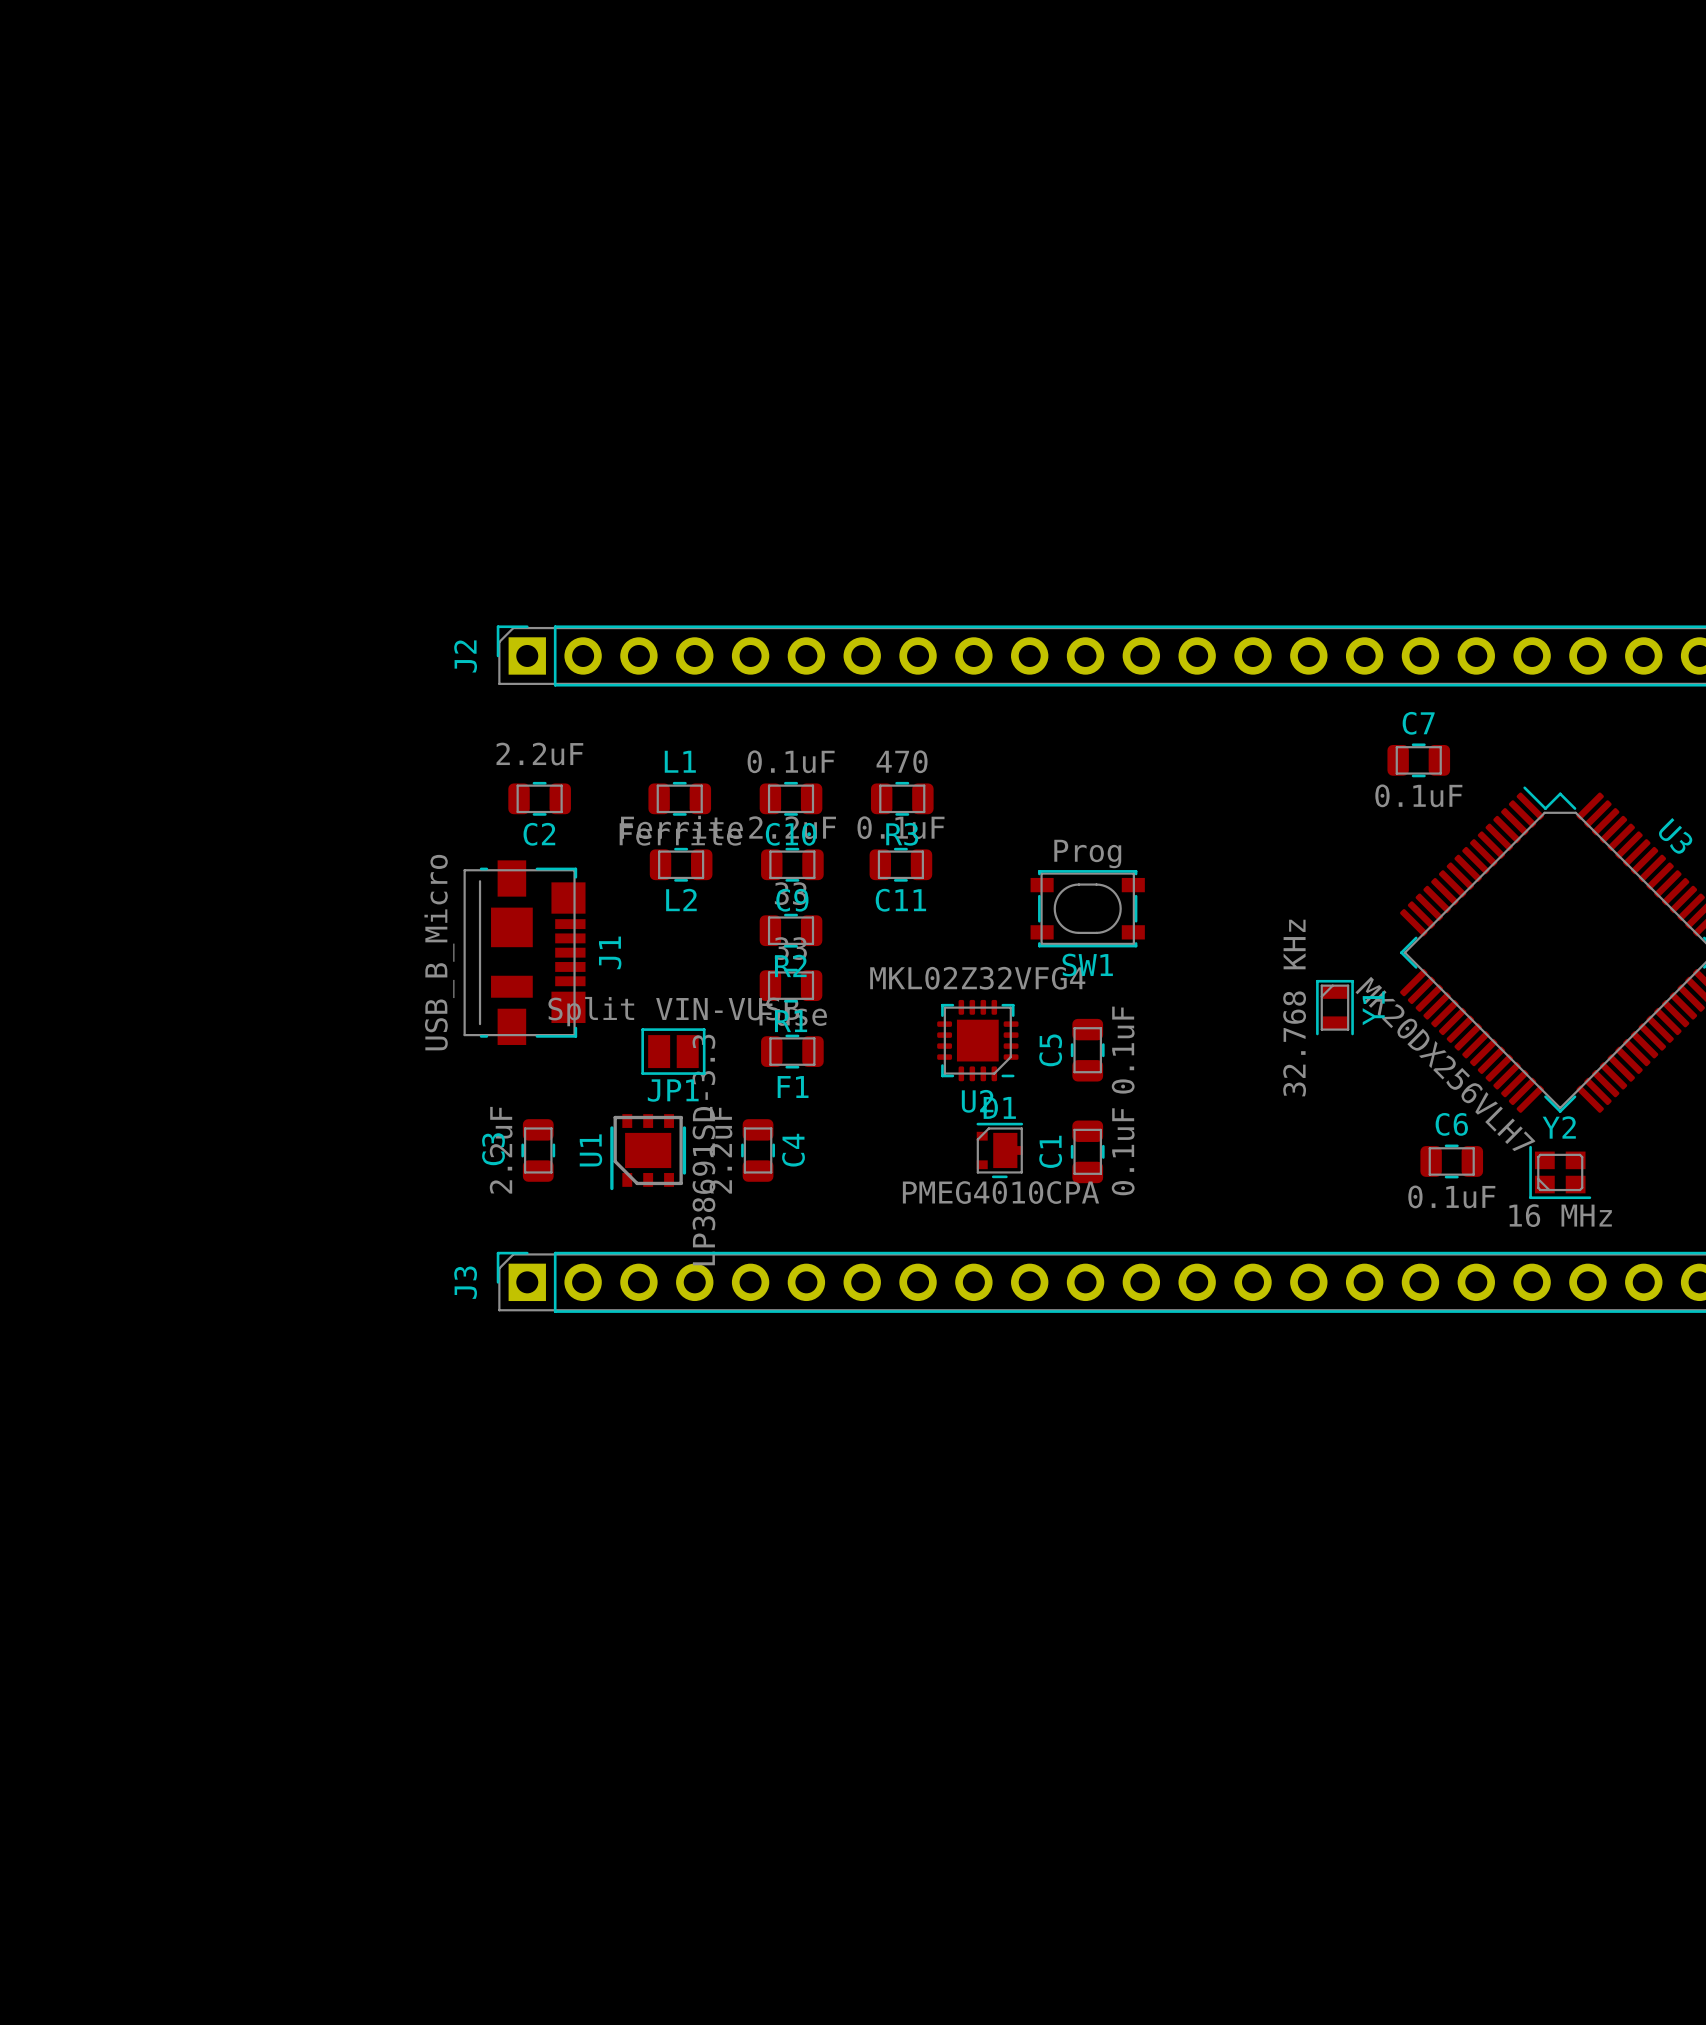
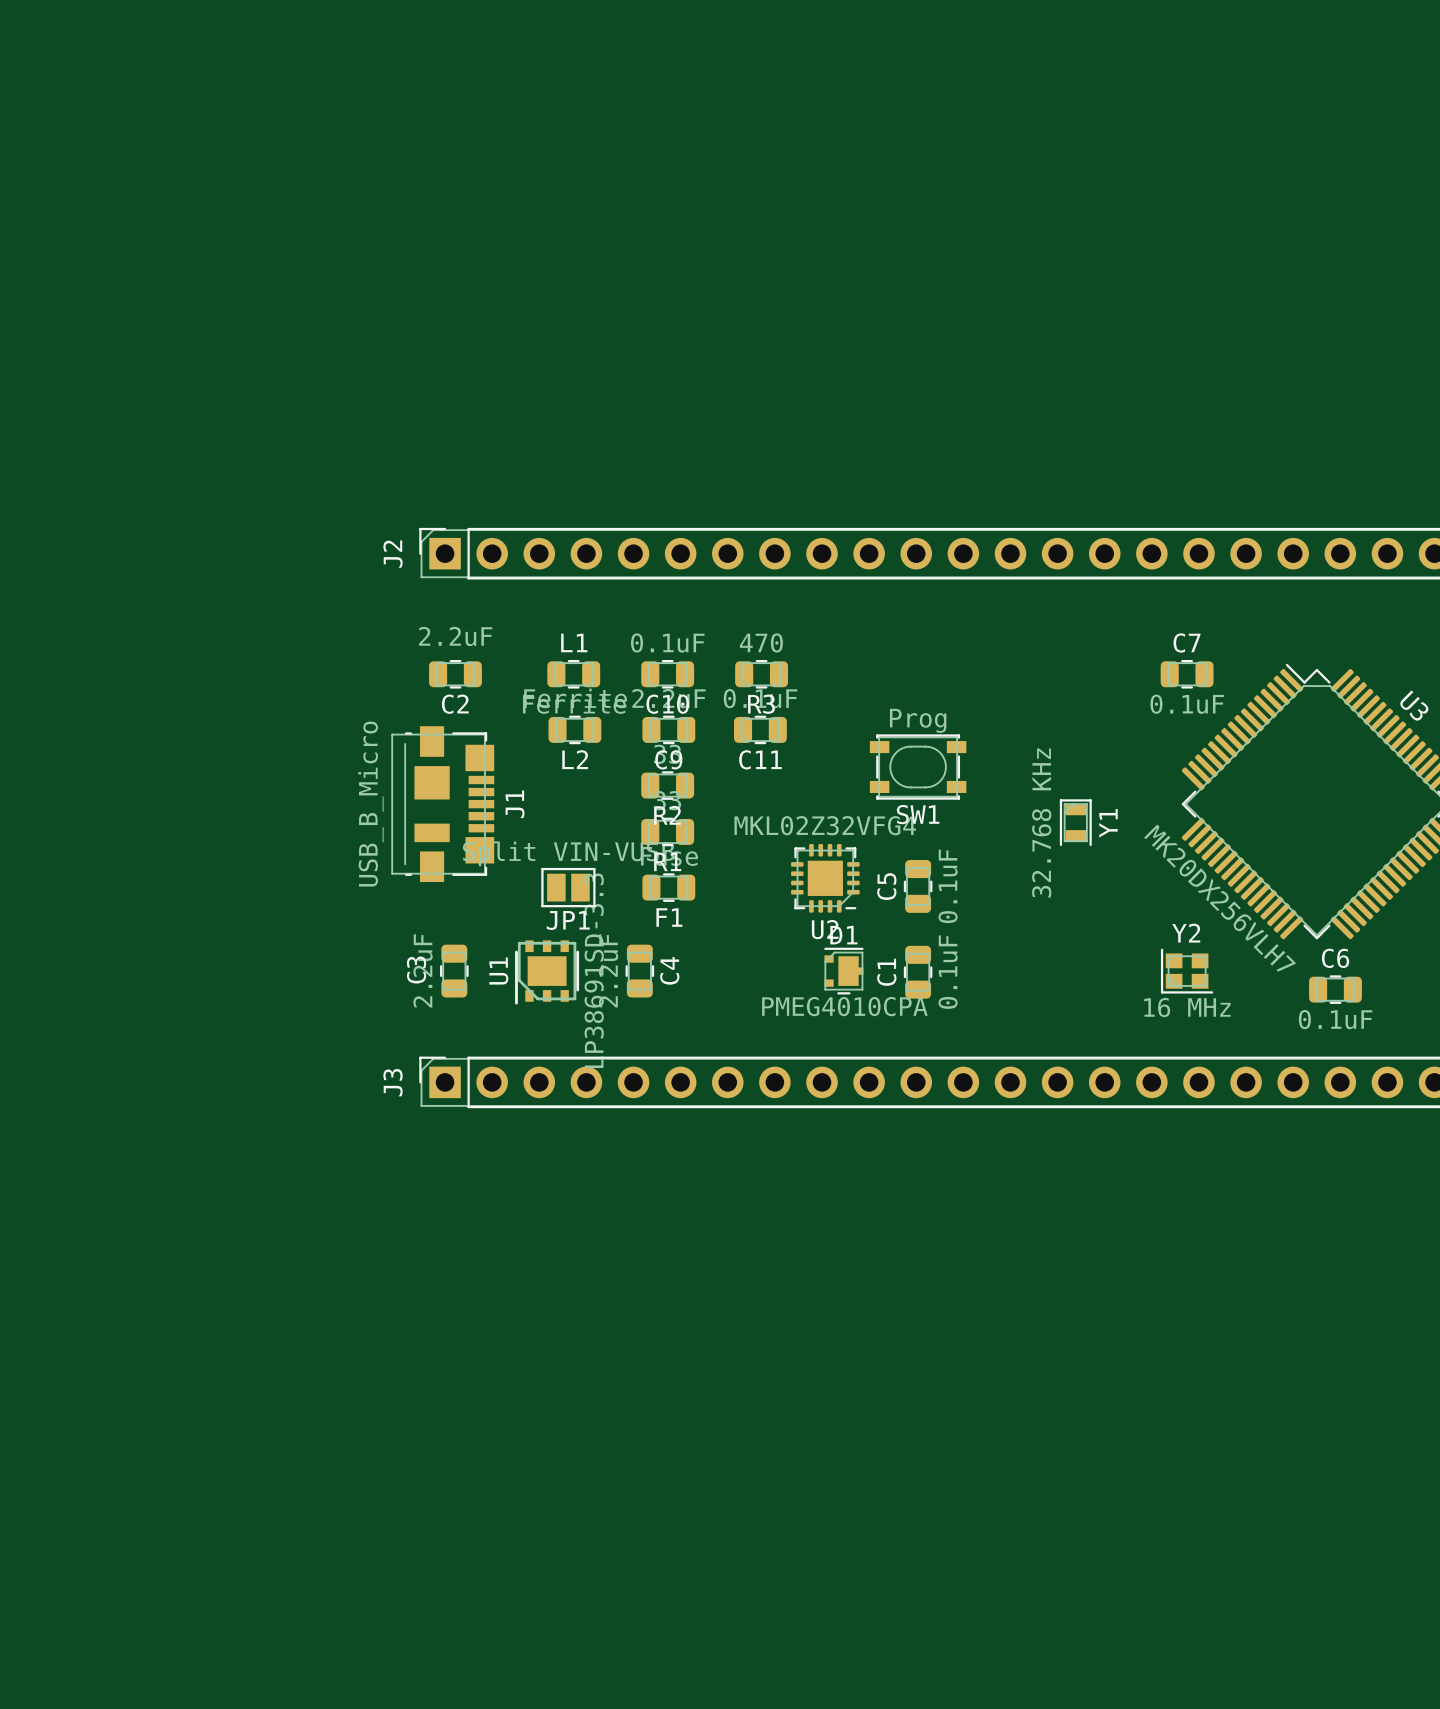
C7 position: (1418, 760) -> (1187, 674)
Y1 position: (1334, 1007) -> (1075, 822)
C6 position: (1451, 1161) -> (1335, 989)
Y2 position: (1560, 1172) -> (1187, 971)

